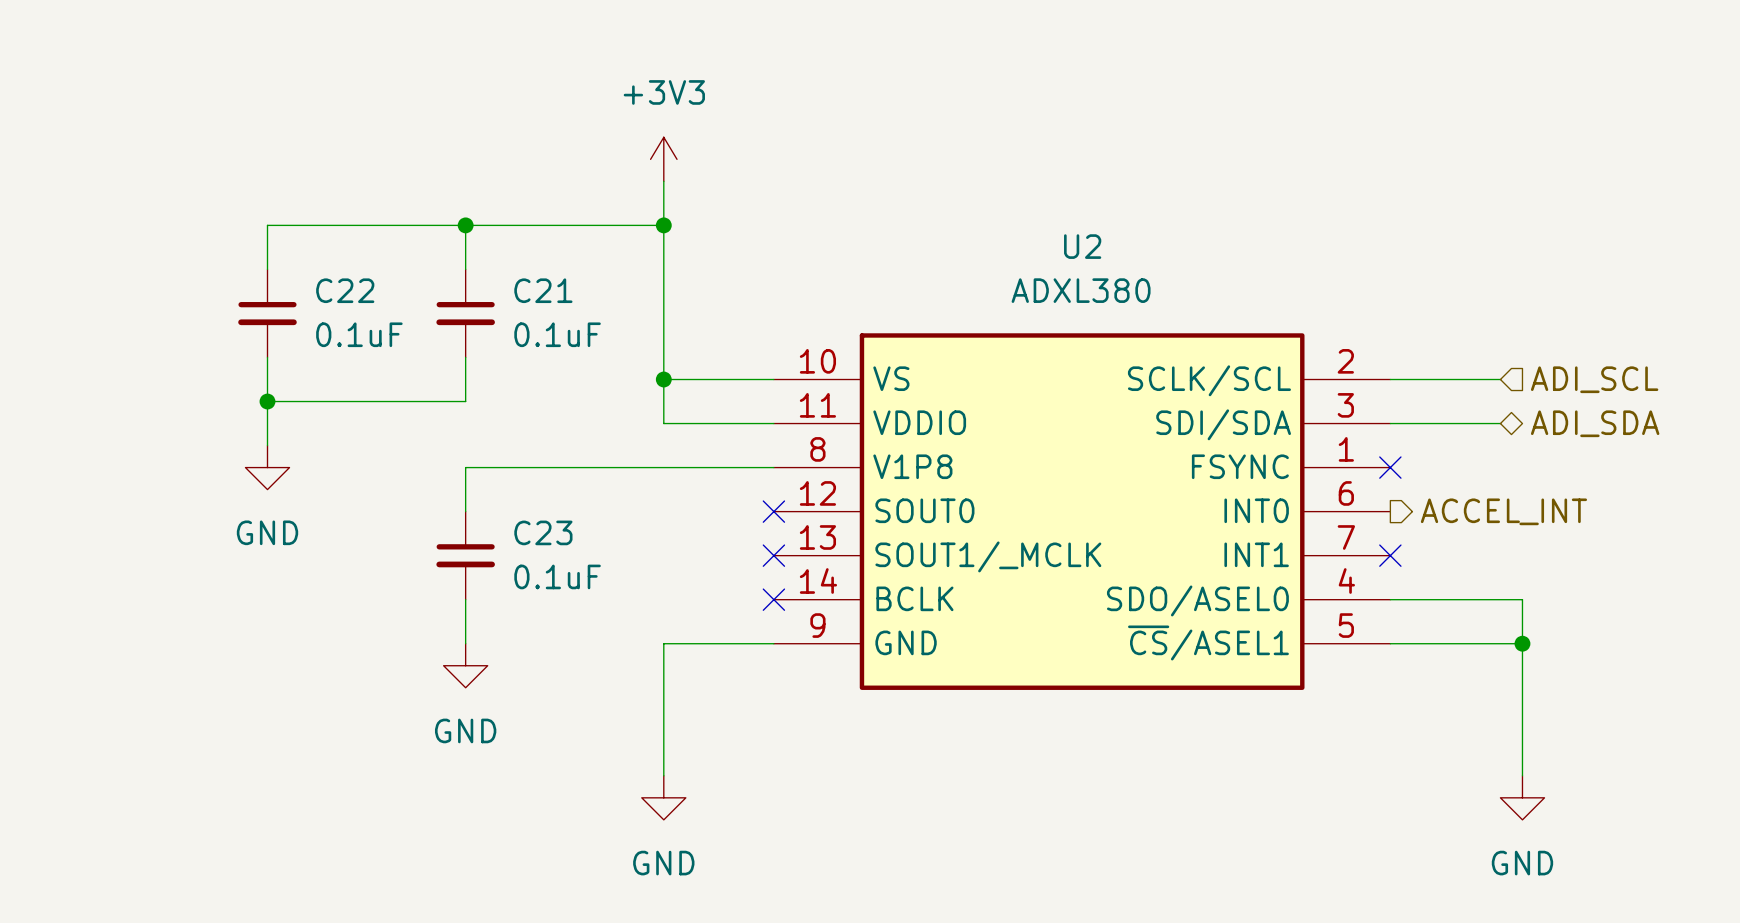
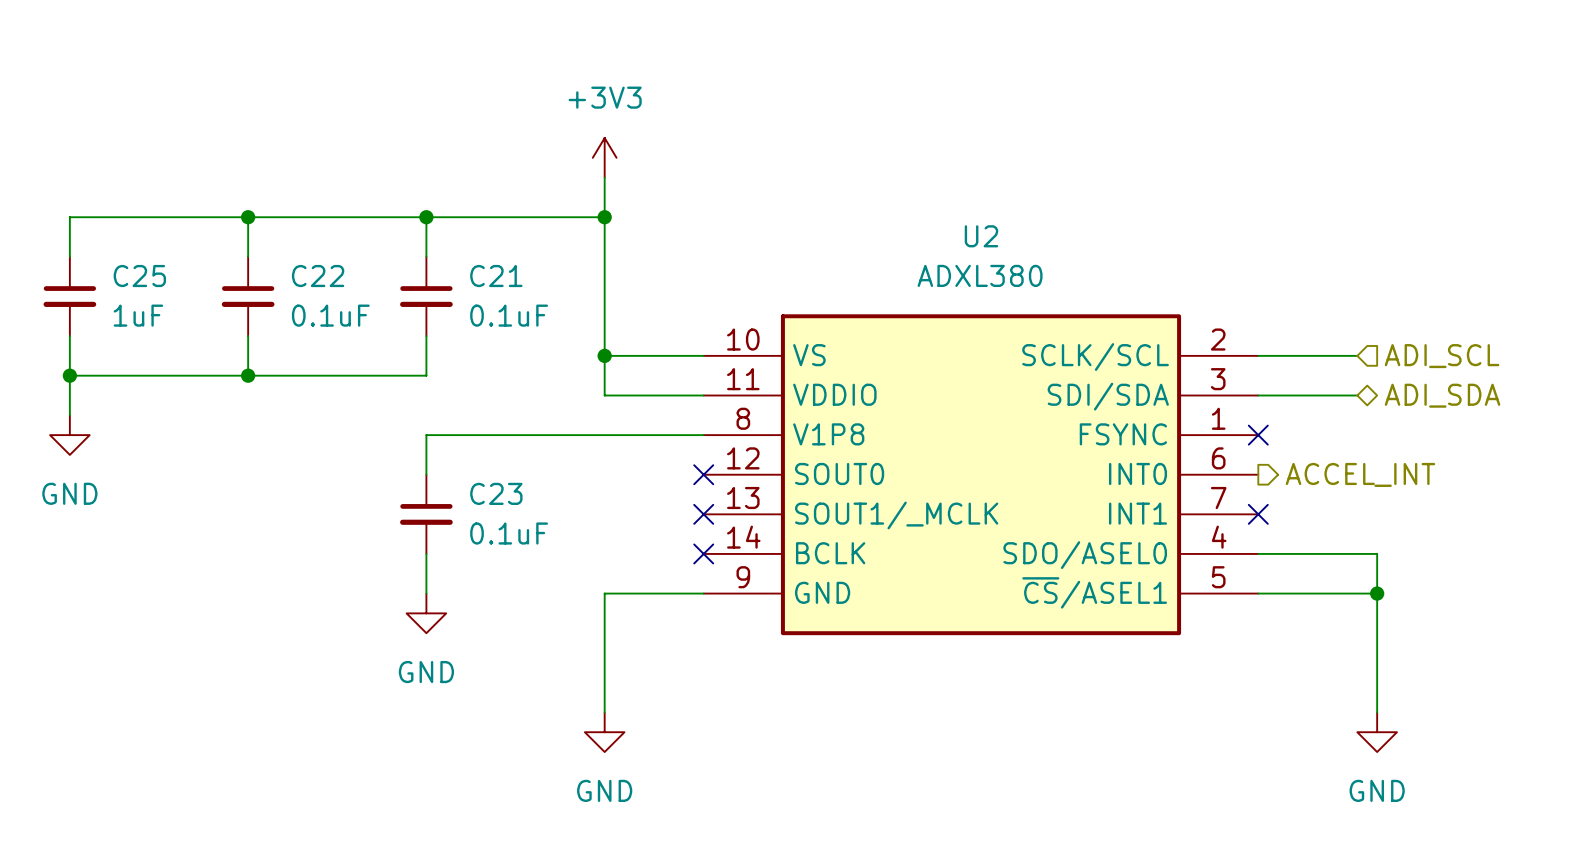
wire: none -> (248, 217) (69, 217) (69, 256)
junction: none -> (248, 217)
C25: none -> 1uF (69, 296)
wire: none -> (69, 336) (69, 415)
junction: none -> (69, 375)
wire: (267, 401) (267, 445) -> (248, 375) (69, 375)
power symbol position: GND (267, 467) -> GND (69, 435)

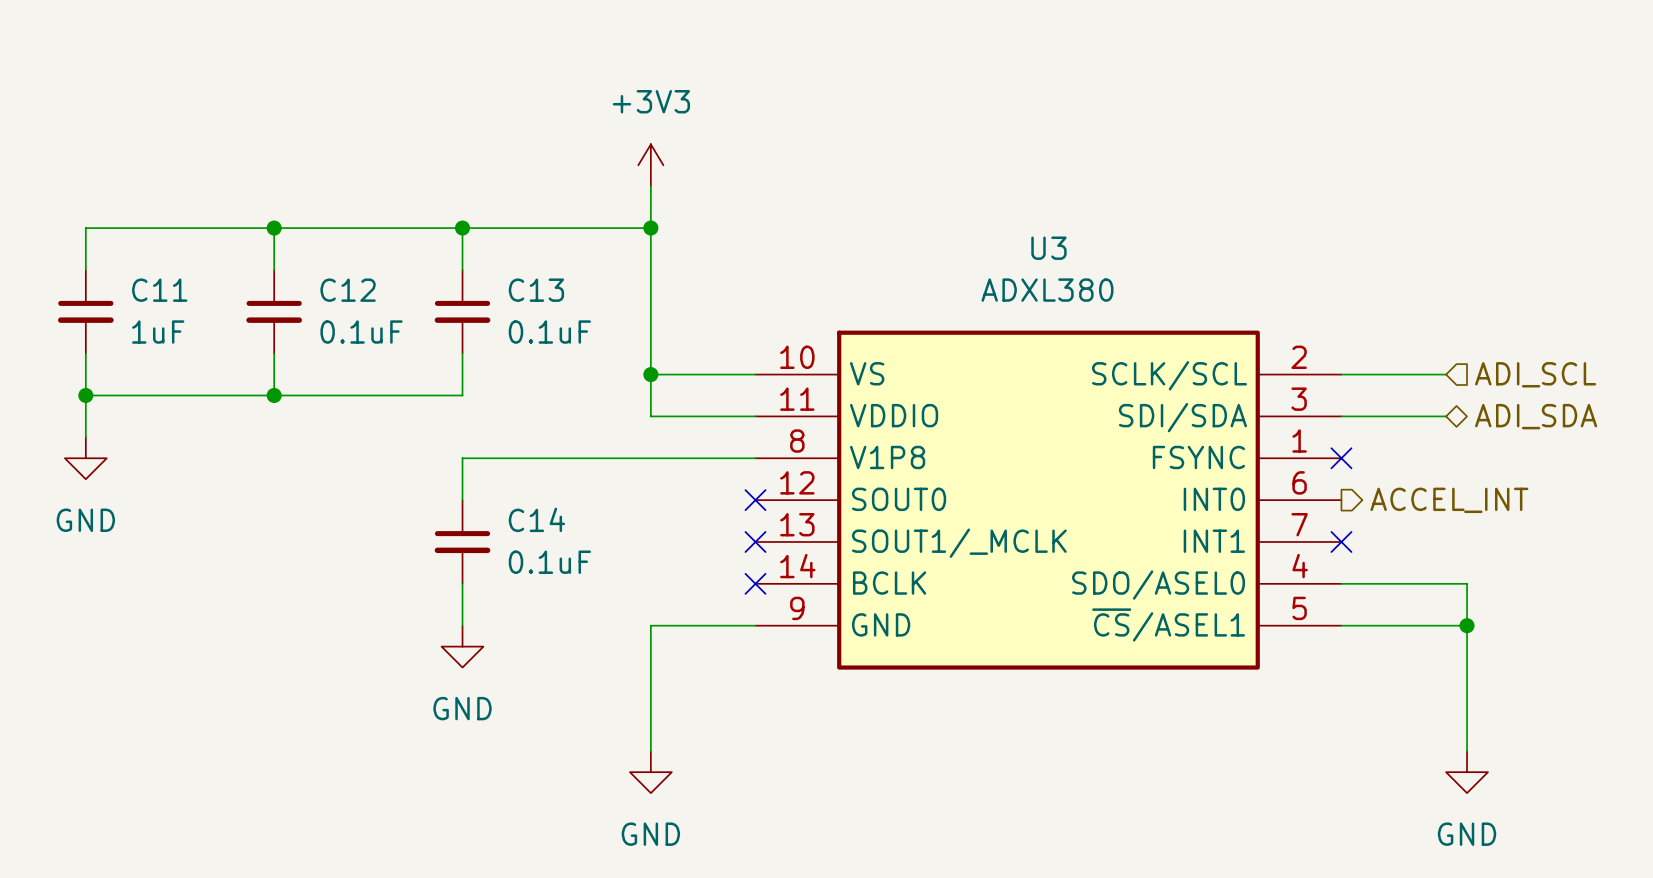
U2 name: U2 (981, 236) -> U3 (1048, 248)
C25 name: C25 (139, 276) -> C11 (159, 290)
C22 name: C22 (318, 276) -> C12 (348, 290)
C21 name: C21 (496, 276) -> C13 (536, 290)
C23 name: C23 (496, 493) -> C14 (536, 519)

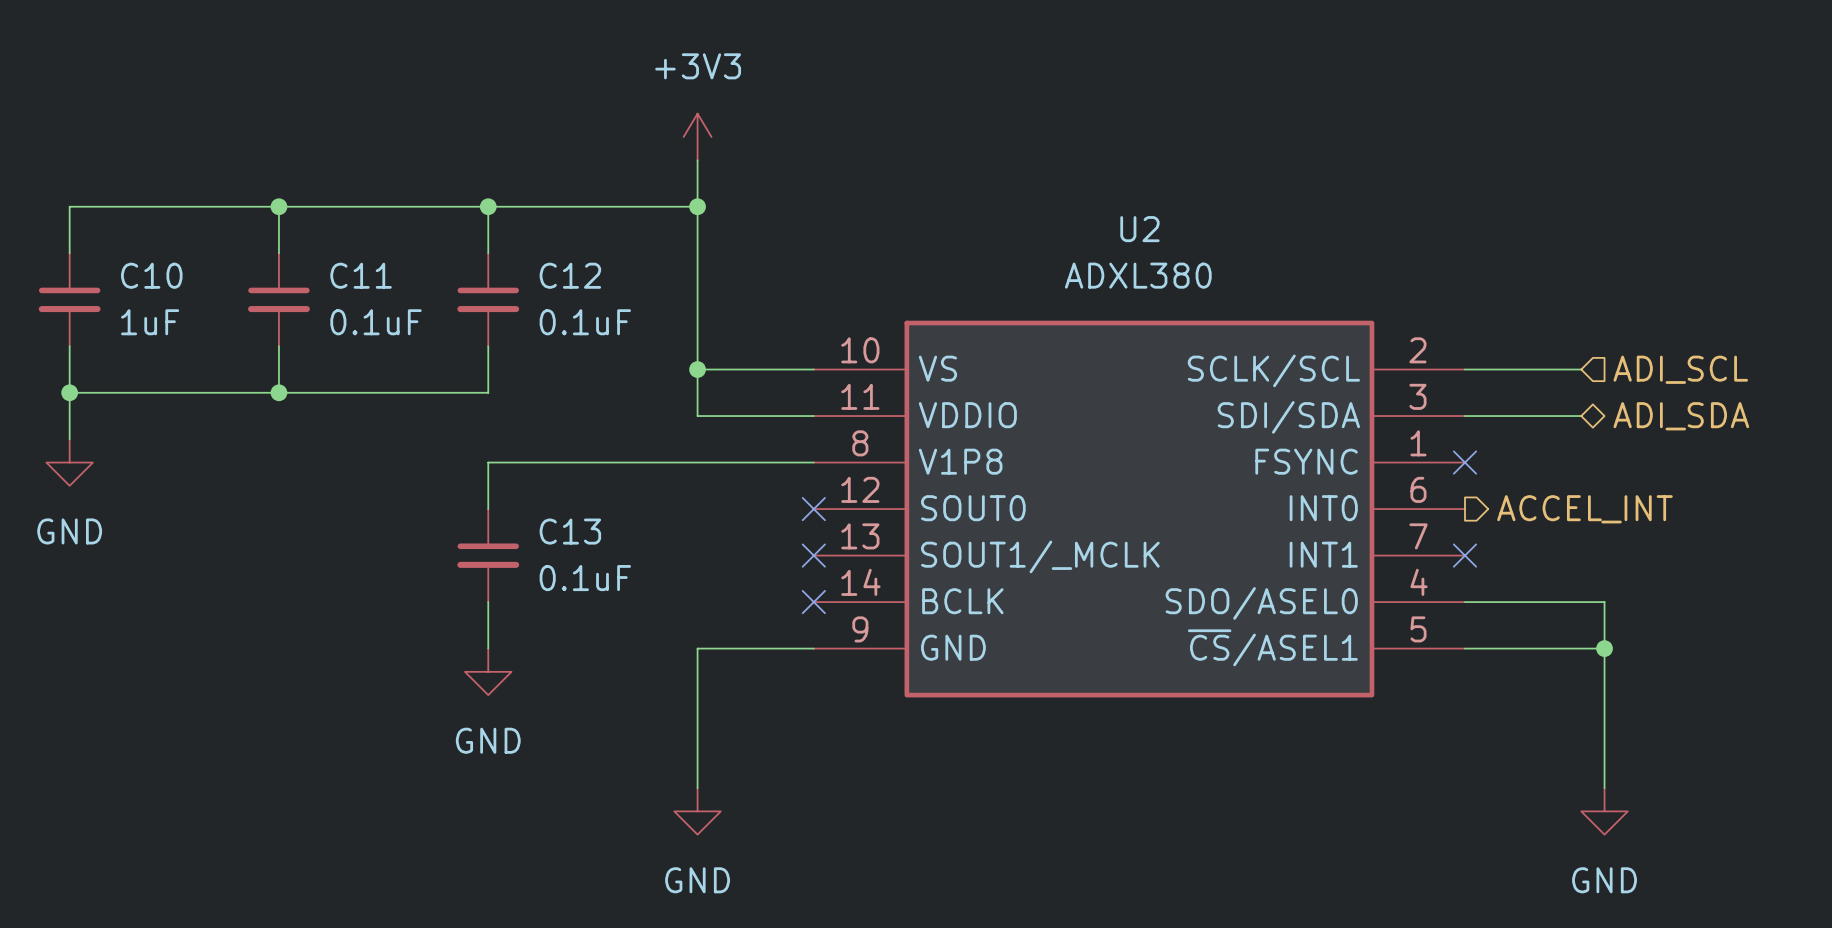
U3 name: U3 (1048, 248) -> U2 (1139, 229)
C11 name: C11 (159, 290) -> C10 (151, 275)
C12 name: C12 (348, 290) -> C11 (361, 275)
C13 name: C13 (536, 290) -> C12 (570, 275)
C14 name: C14 (536, 519) -> C13 (570, 531)

